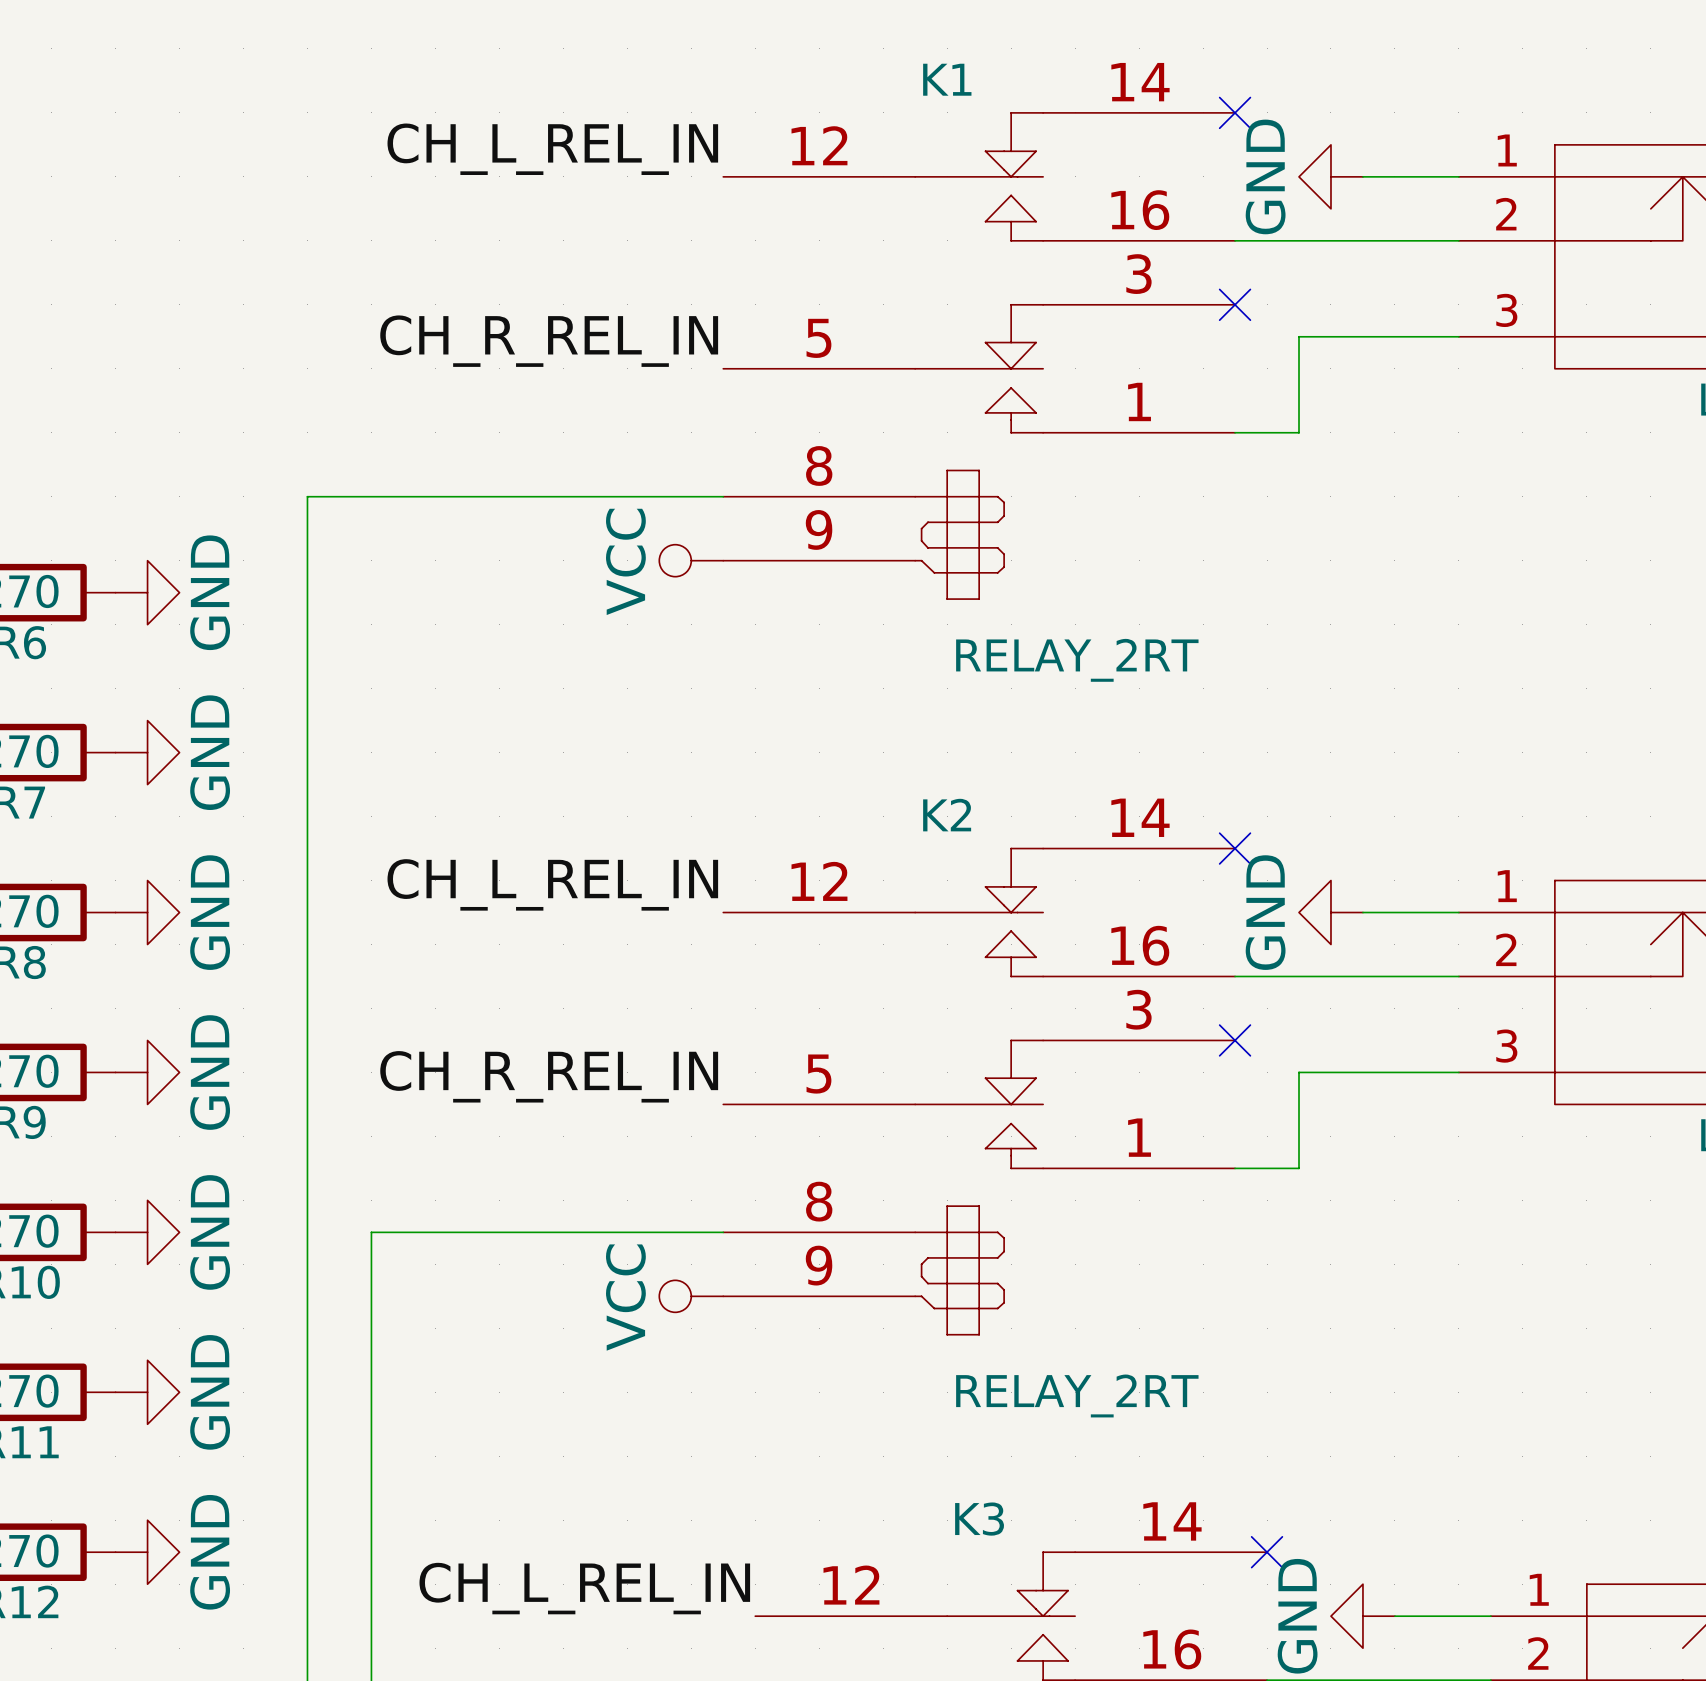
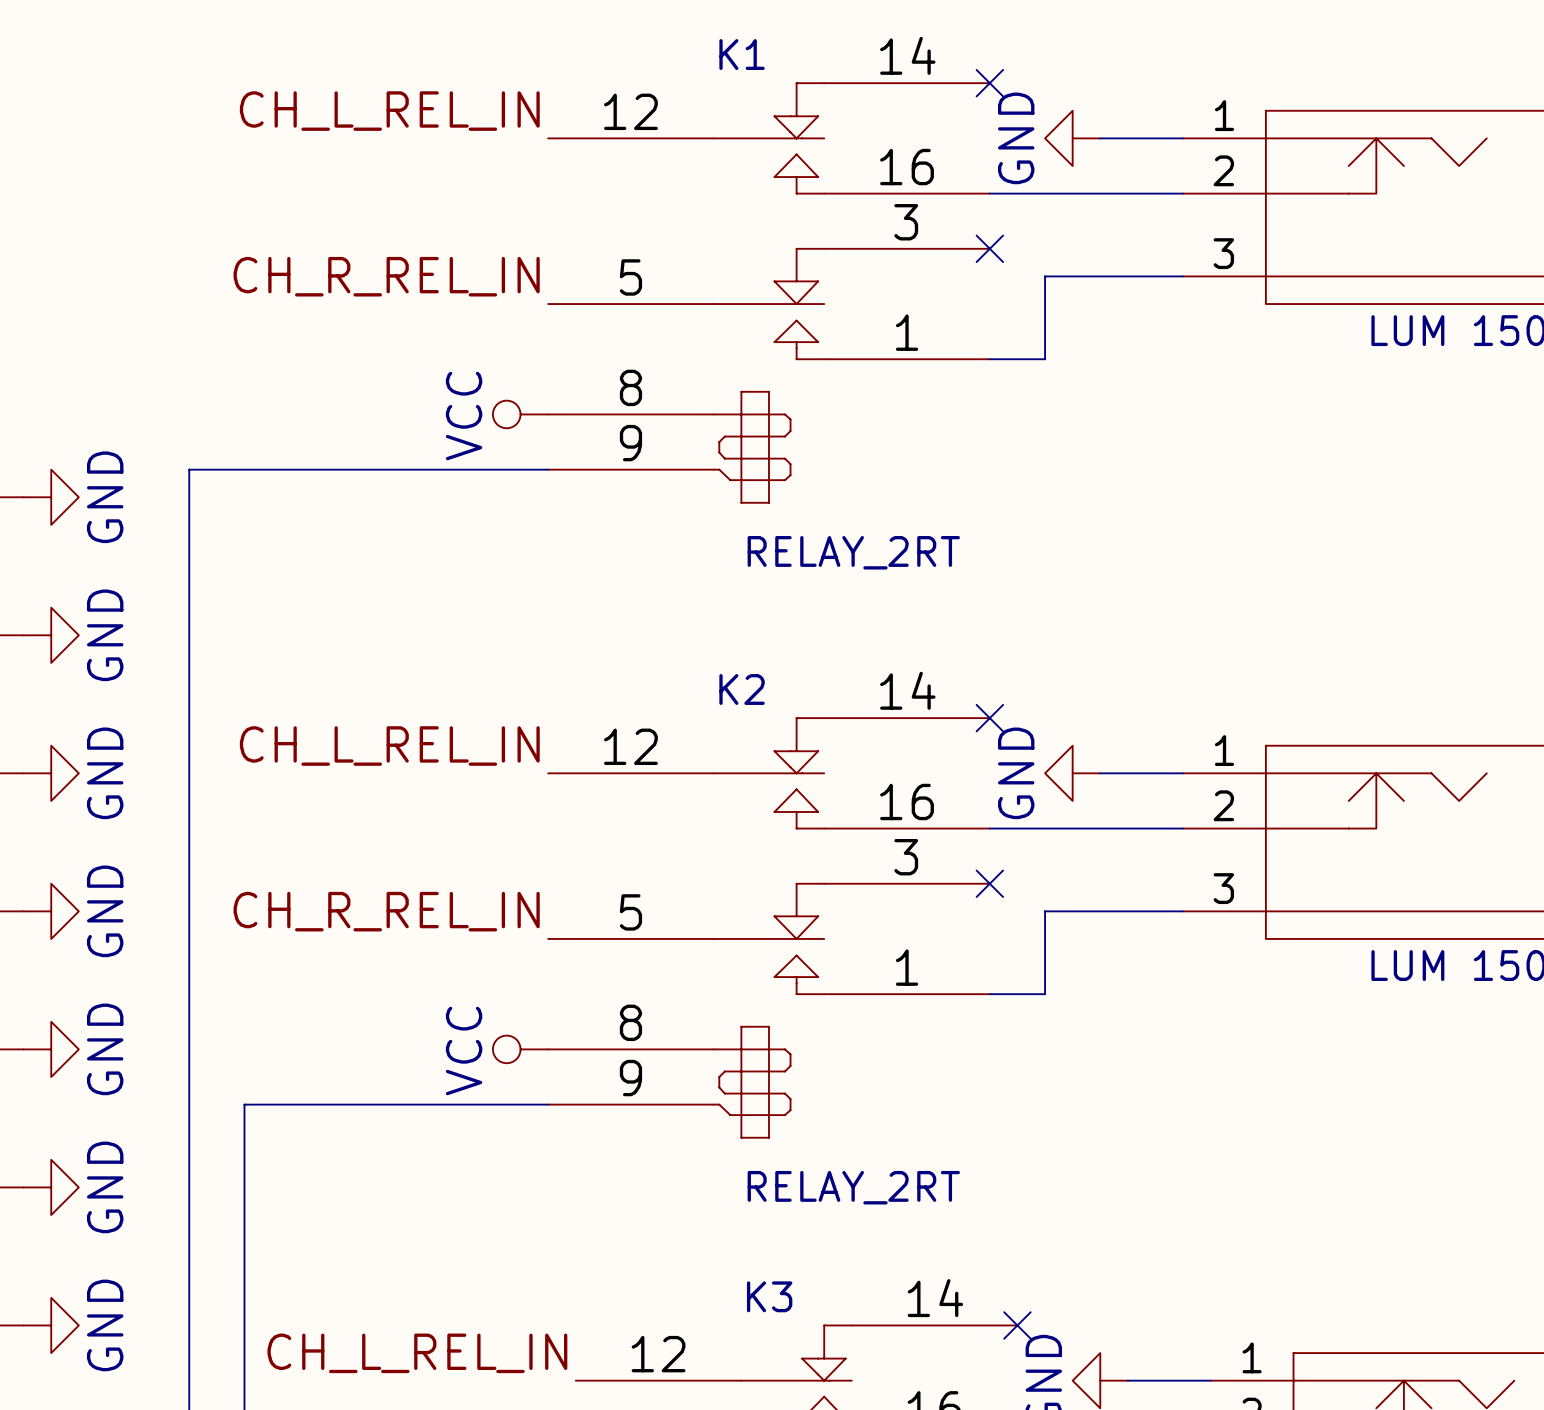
wire: (723, 496) (307, 496) (307, 560) -> (548, 469) (189, 469)
power symbol position: VCC (691, 560) -> VCC (520, 414)
wire: (723, 1232) (371, 1232) (371, 1296) -> (548, 1104) (244, 1104)
power symbol position: VCC (691, 1296) -> VCC (520, 1049)

